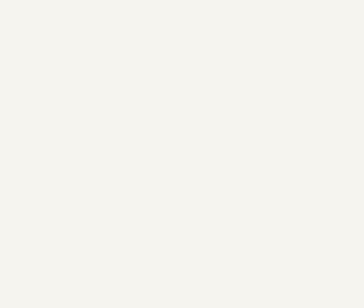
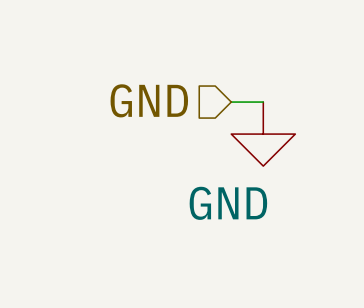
hierarchical label: none -> GND (149, 100)
wire: none -> (231, 102) (263, 102)
power symbol: none -> GND (263, 134)

